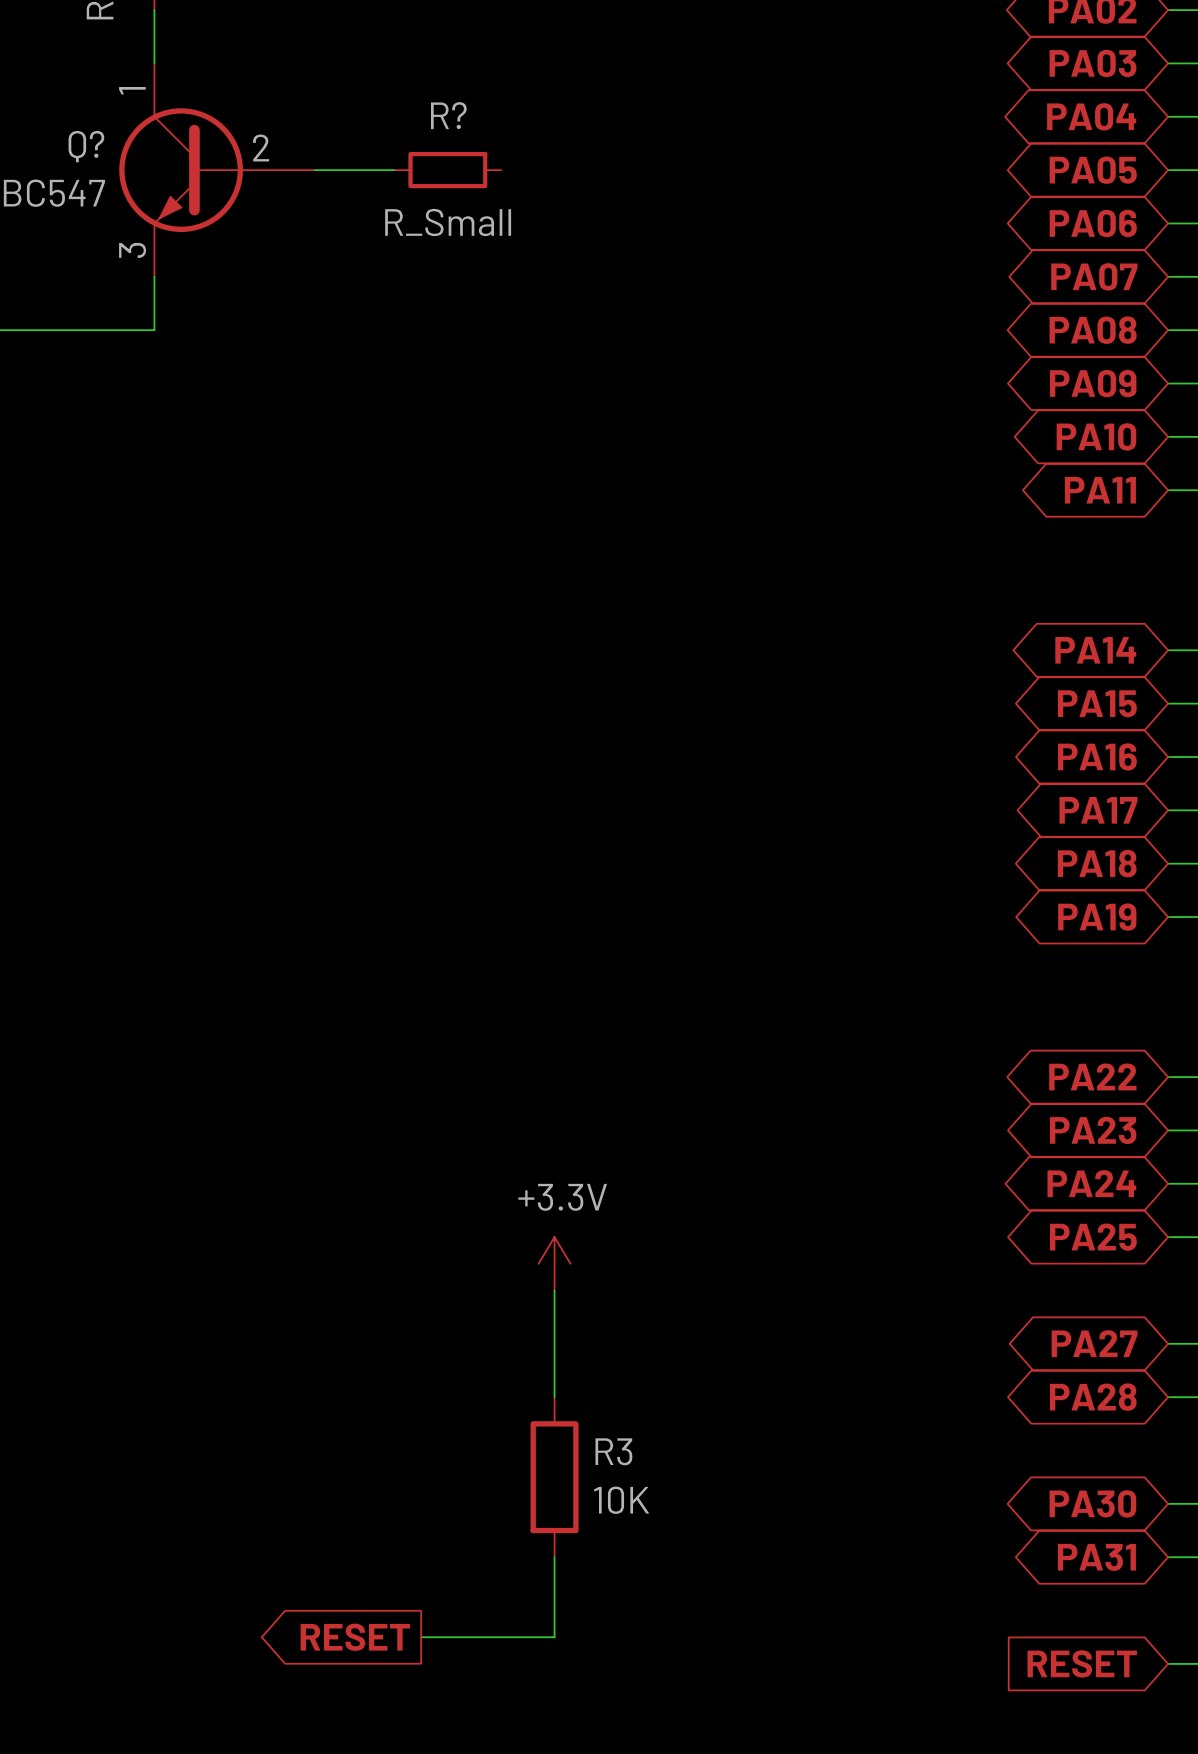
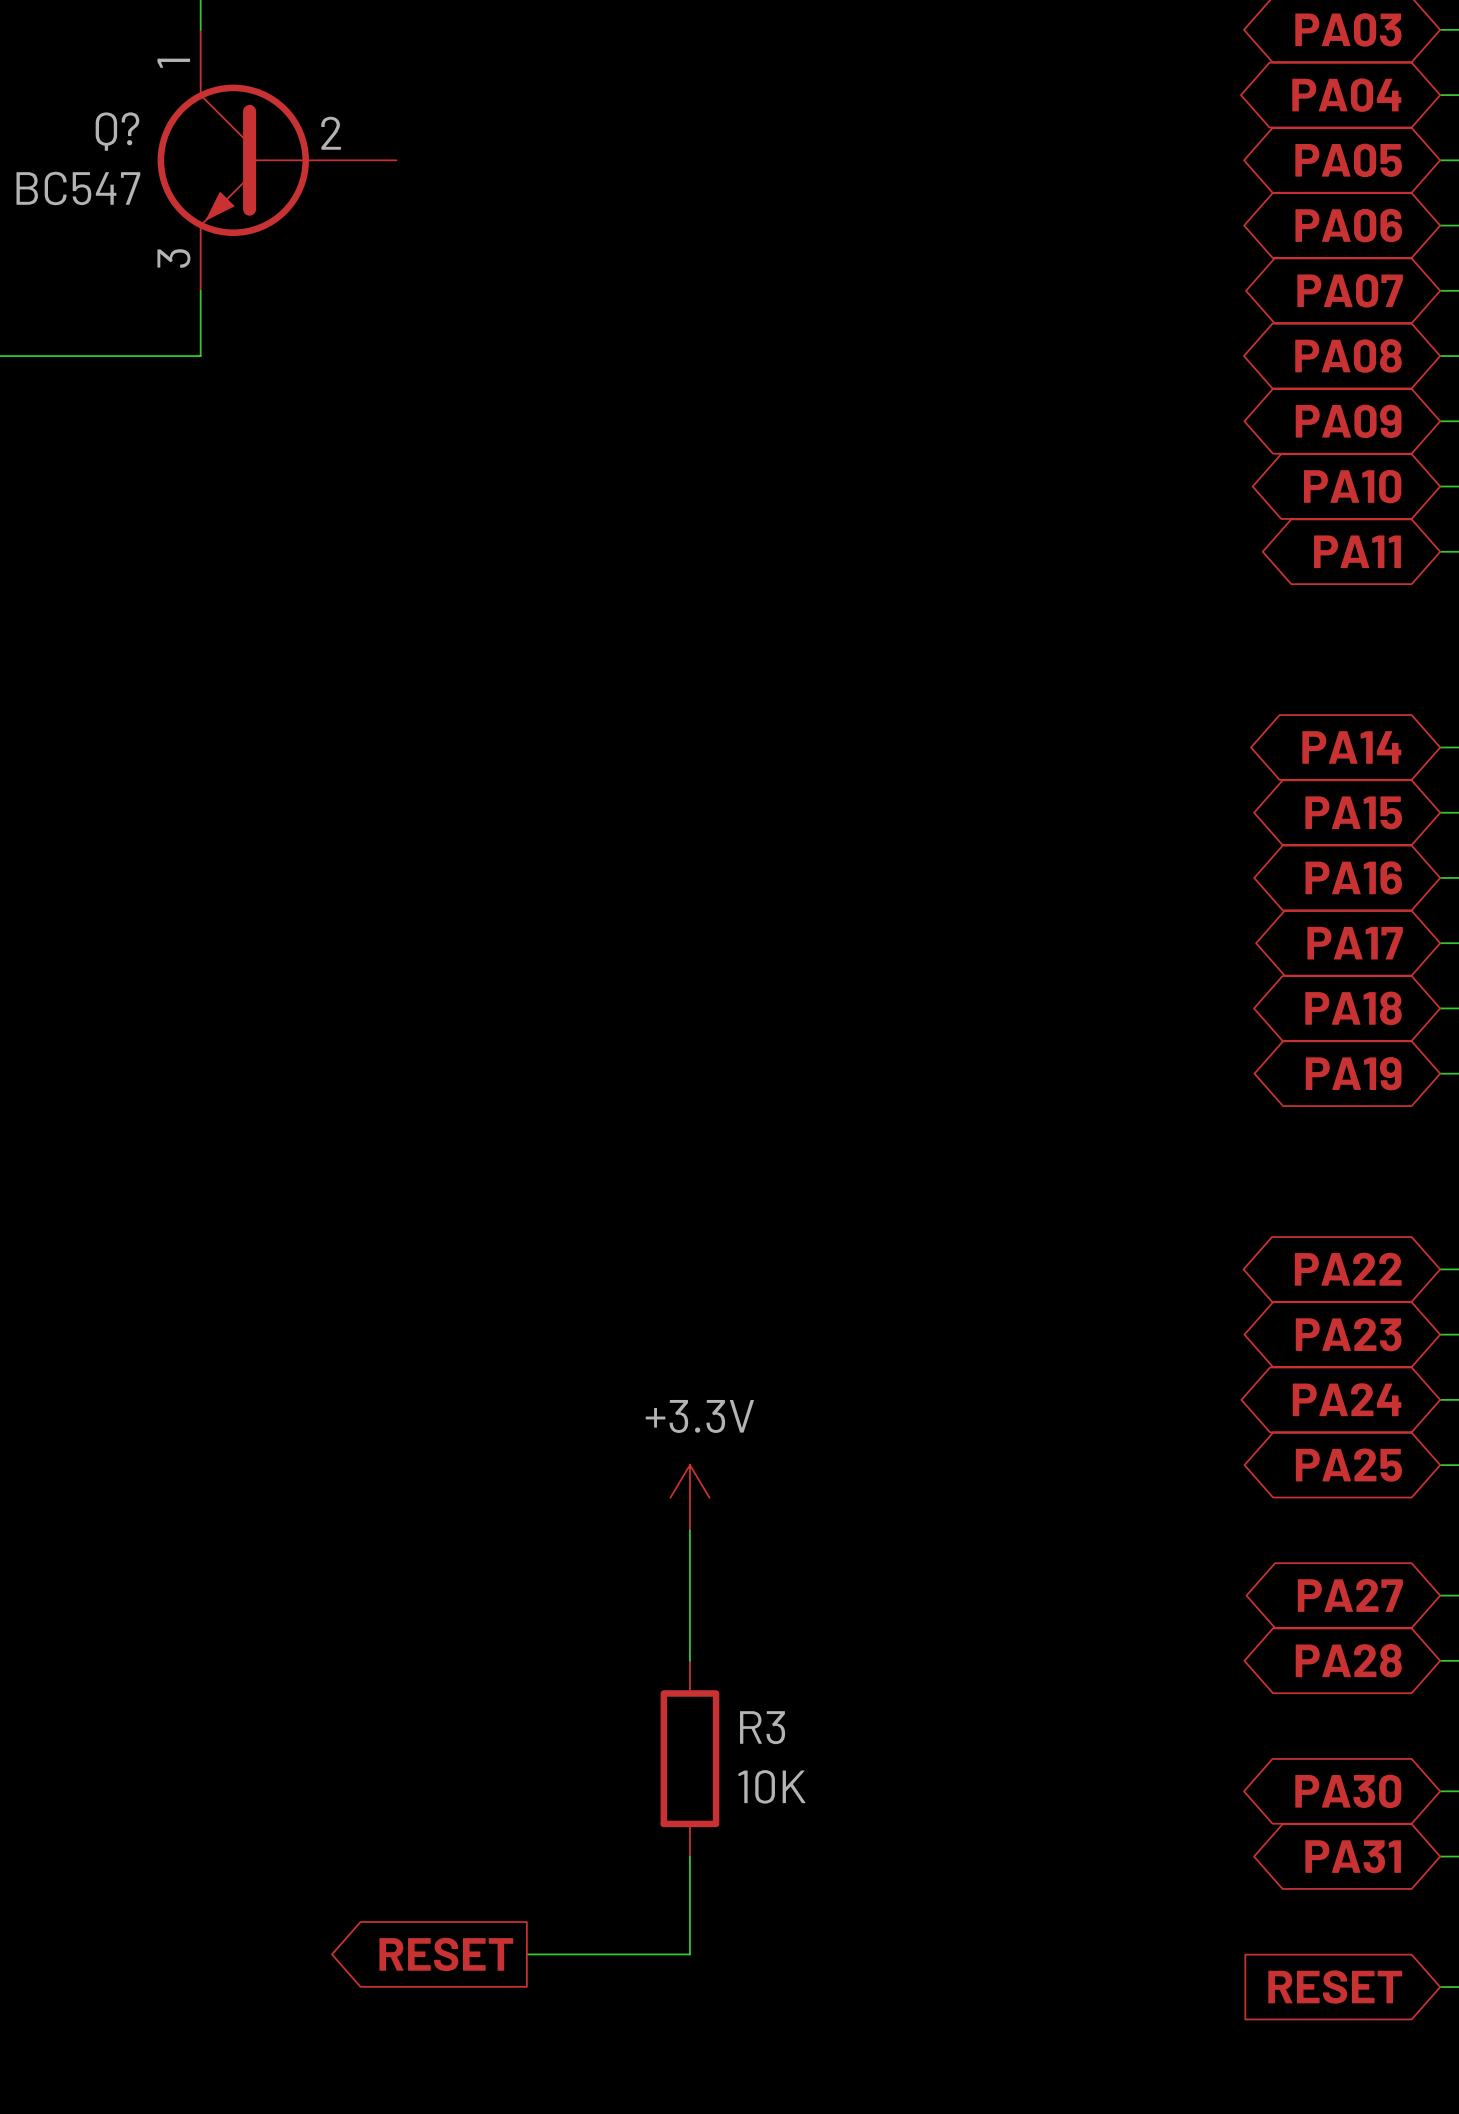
wire: (314, 170) (394, 170) -> none
R?: R_Small (447, 170) -> none

